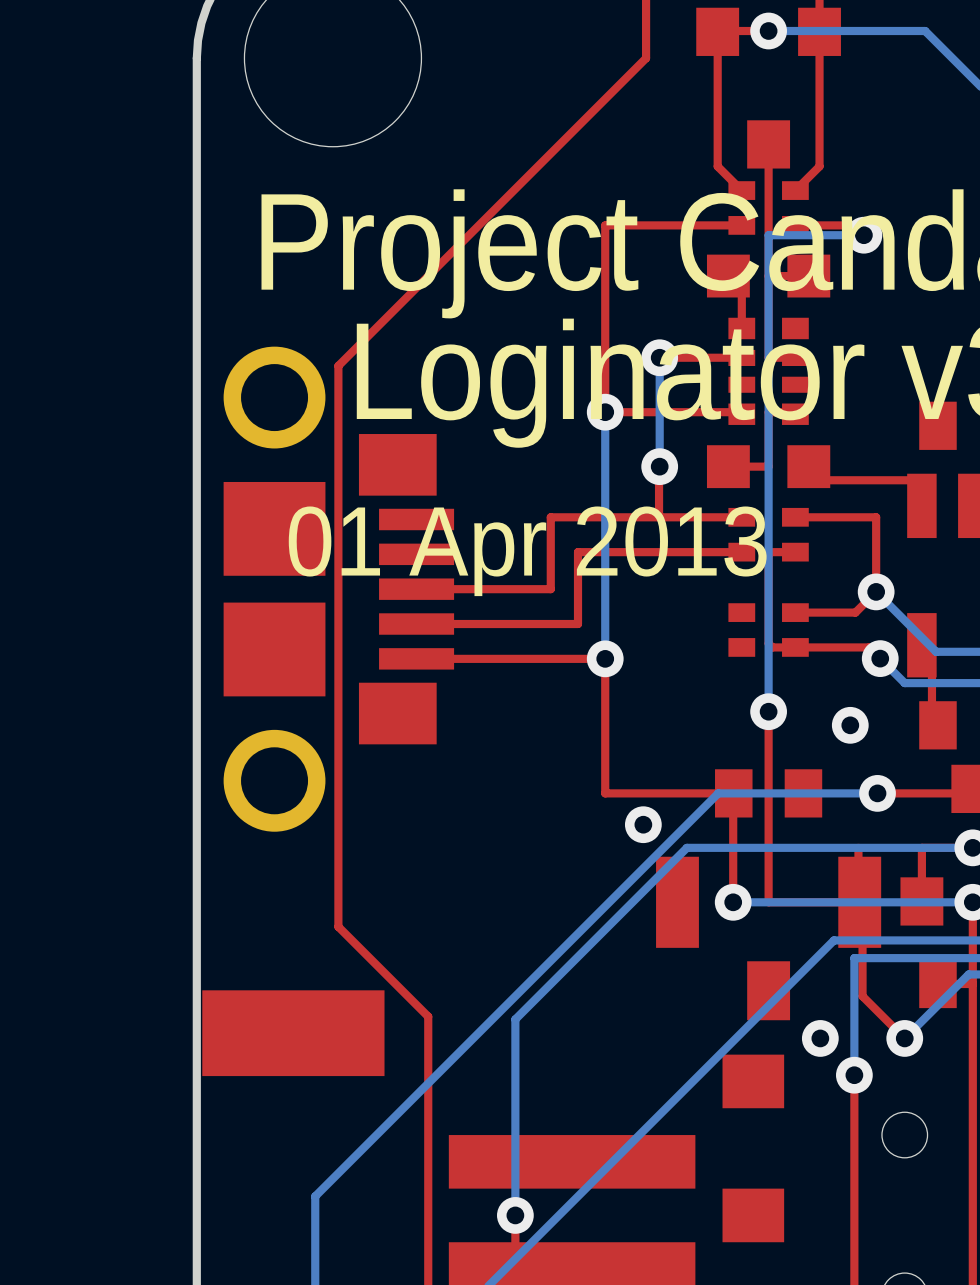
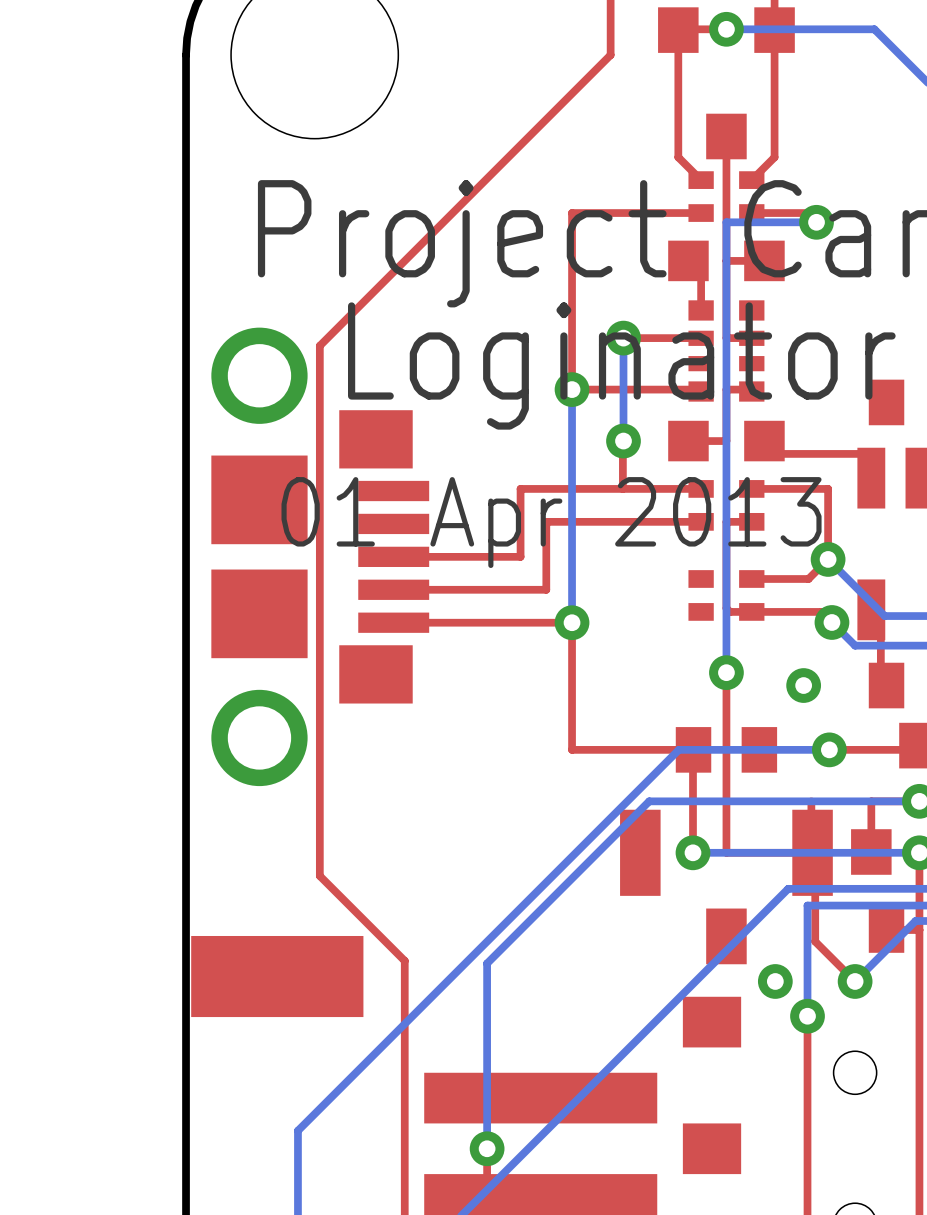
via: (643, 824) -> none

